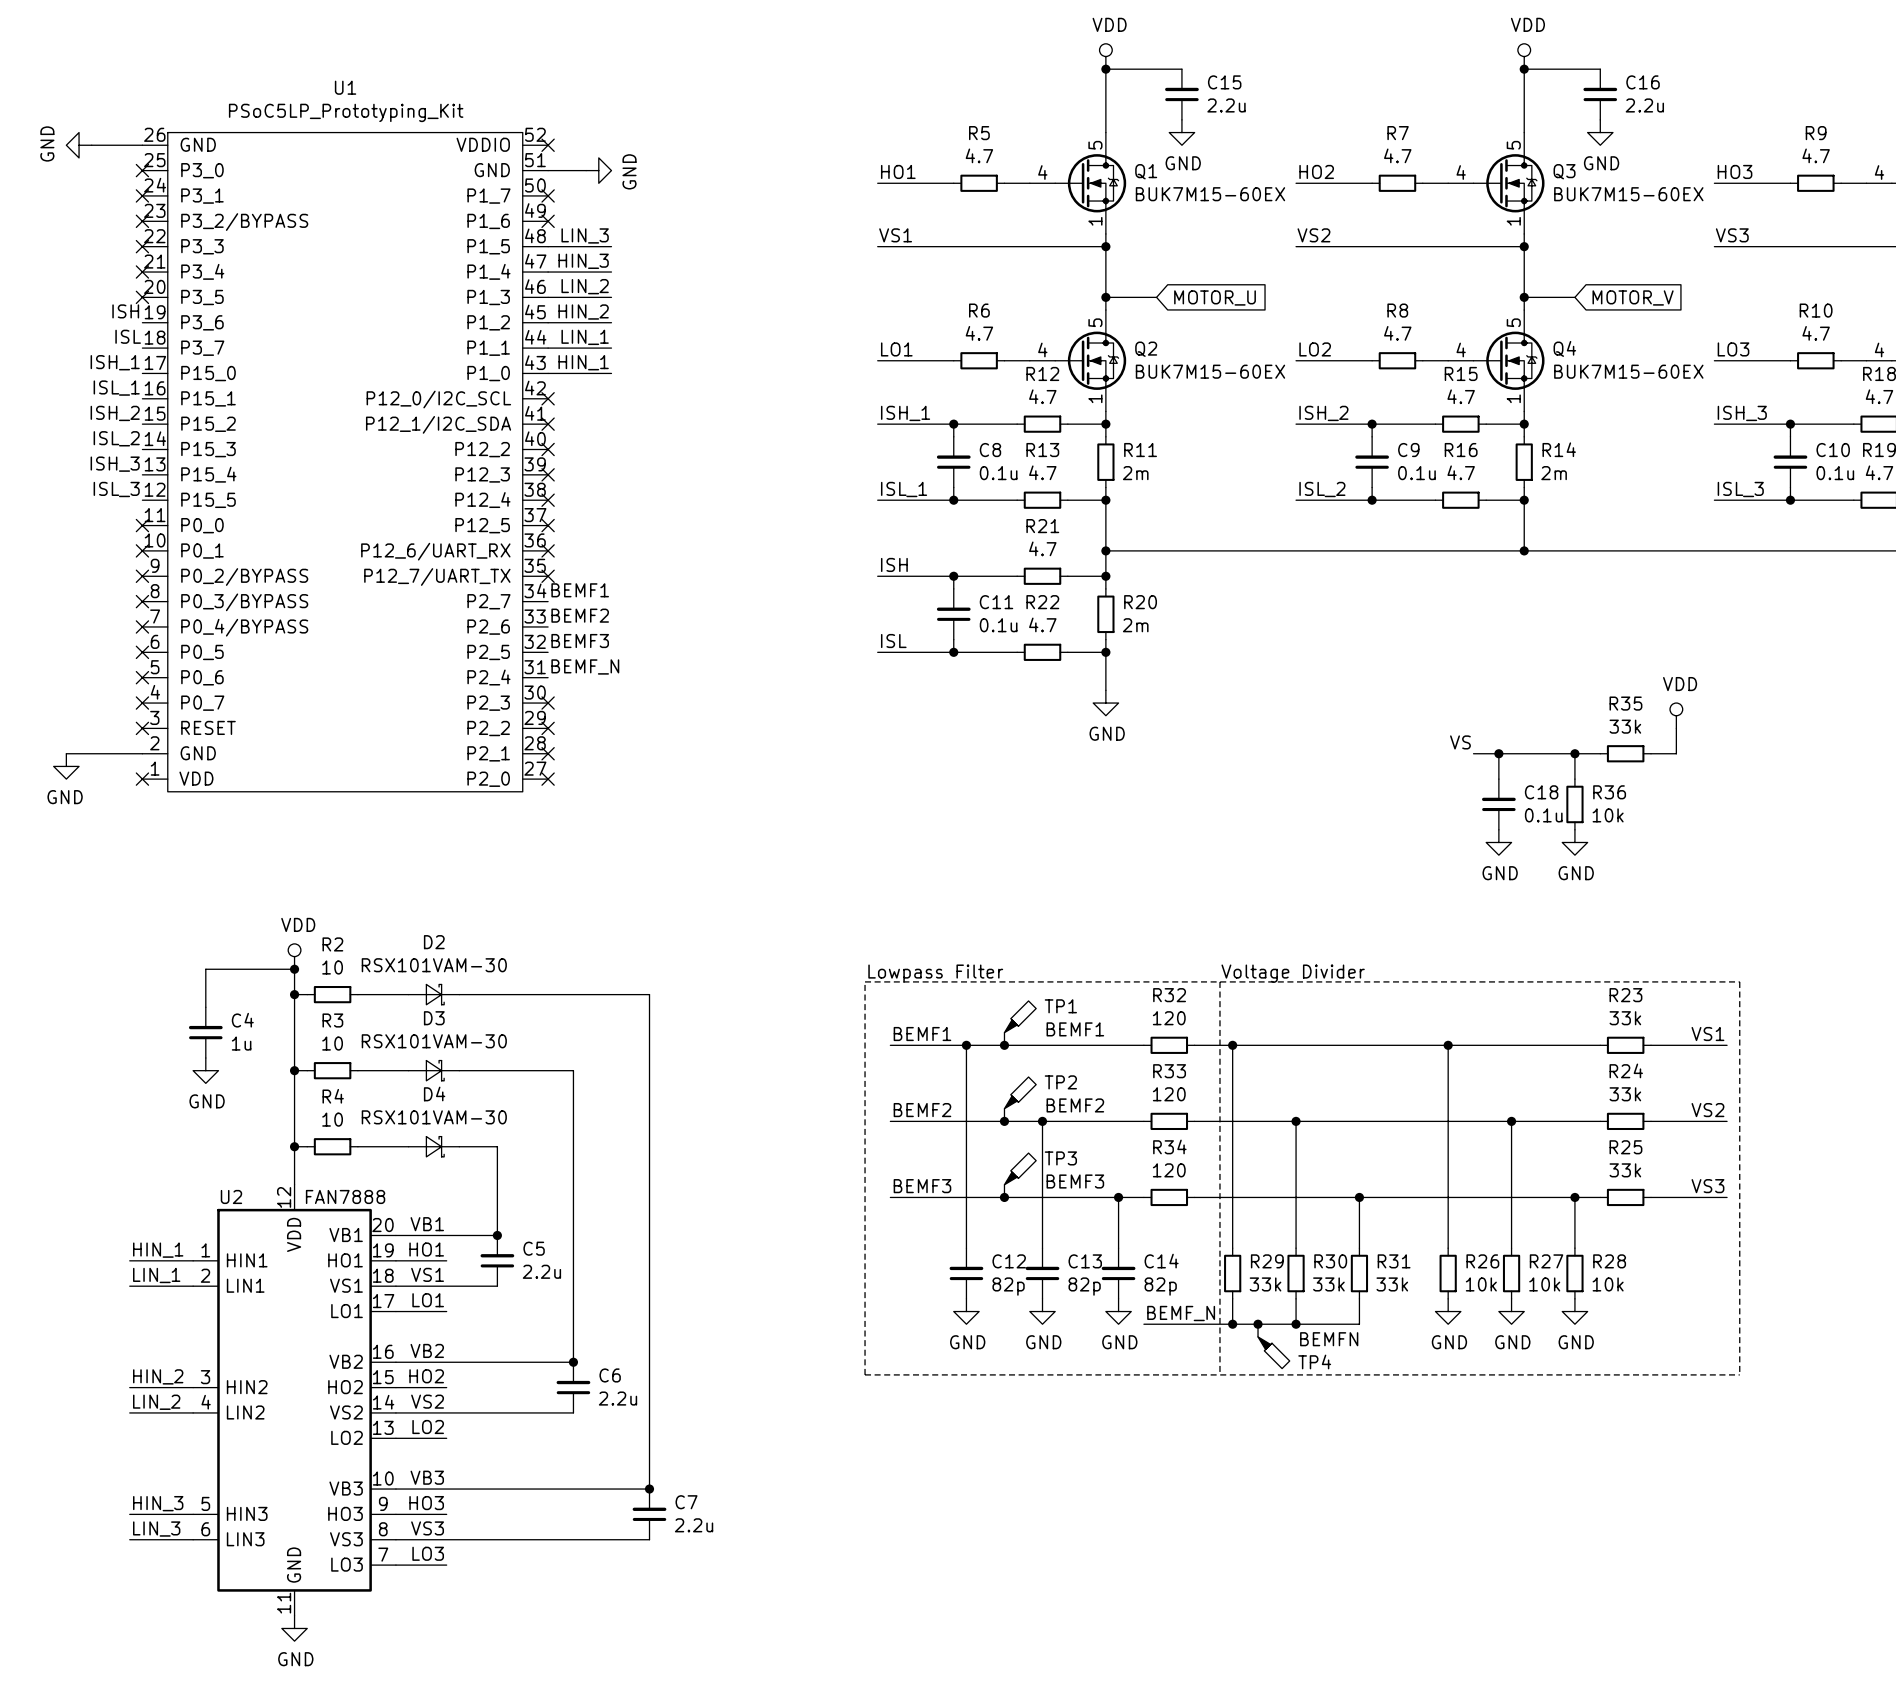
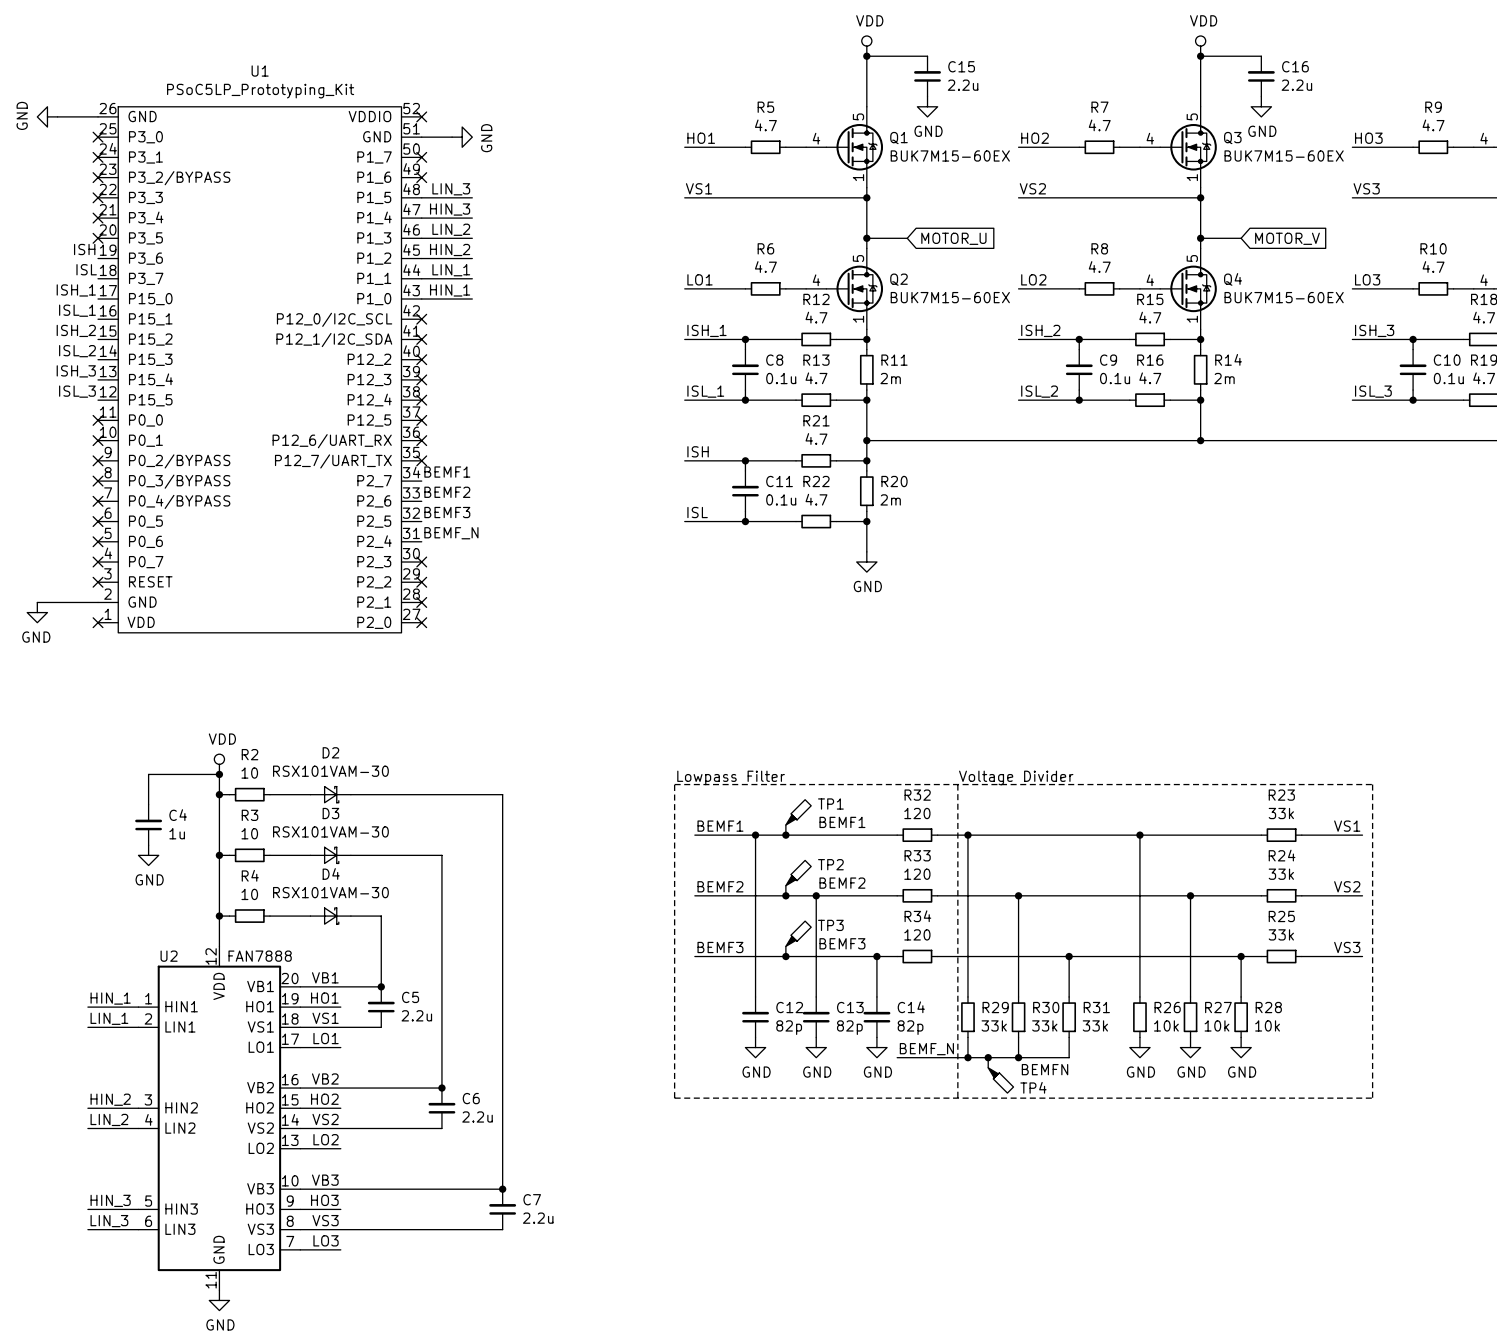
power symbol: VDD (1676, 715) -> none
wire: (1676, 728) (1676, 753) (1651, 753) -> none
label: VS (1460, 742) -> none
wire: (1473, 753) (1600, 753) -> none
wire: (1498, 753) (1498, 779) -> none
junction: (1498, 753) -> none
wire: (1574, 753) (1574, 779) -> none
junction: (1574, 753) -> none
R35: 33k (1625, 753) -> none
C18: 0.1u (1498, 804) -> none
R36: 10k (1574, 804) -> none
power symbol: GND (1498, 842) -> none
power symbol: GND (1574, 842) -> none

